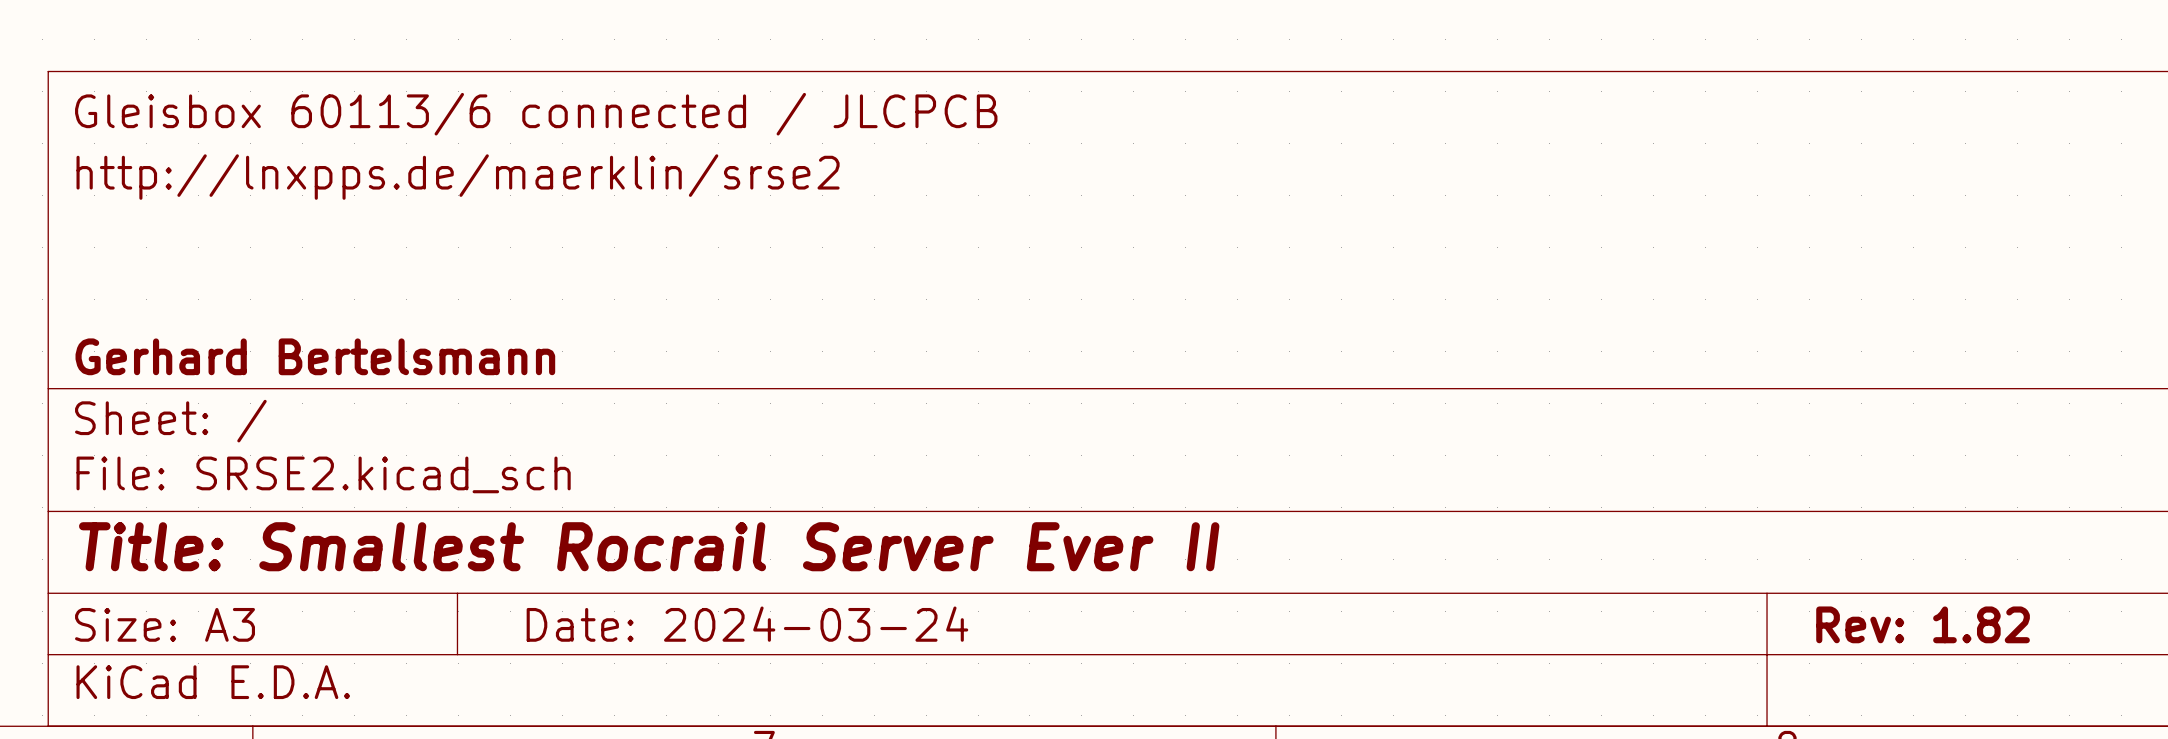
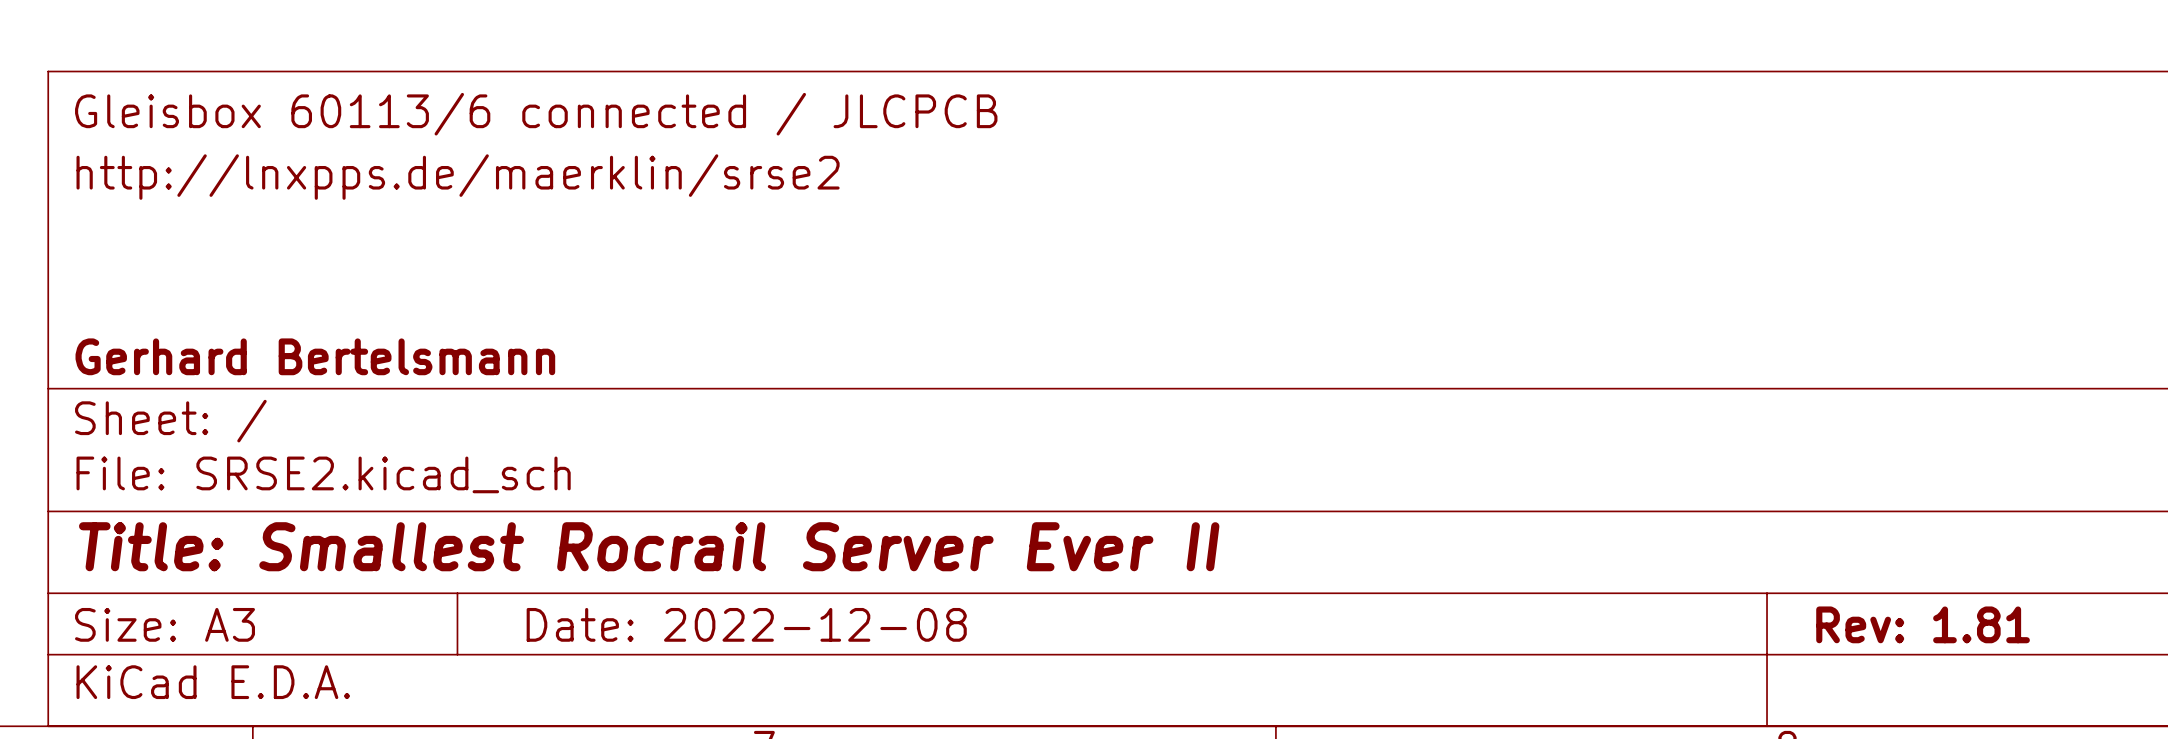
title block: Date: 2024-03-24 (747, 624) -> Date: 2022-12-08 (746, 624)
title block: Rev: 1.82 (1923, 624) -> Rev: 1.81 (1923, 624)

